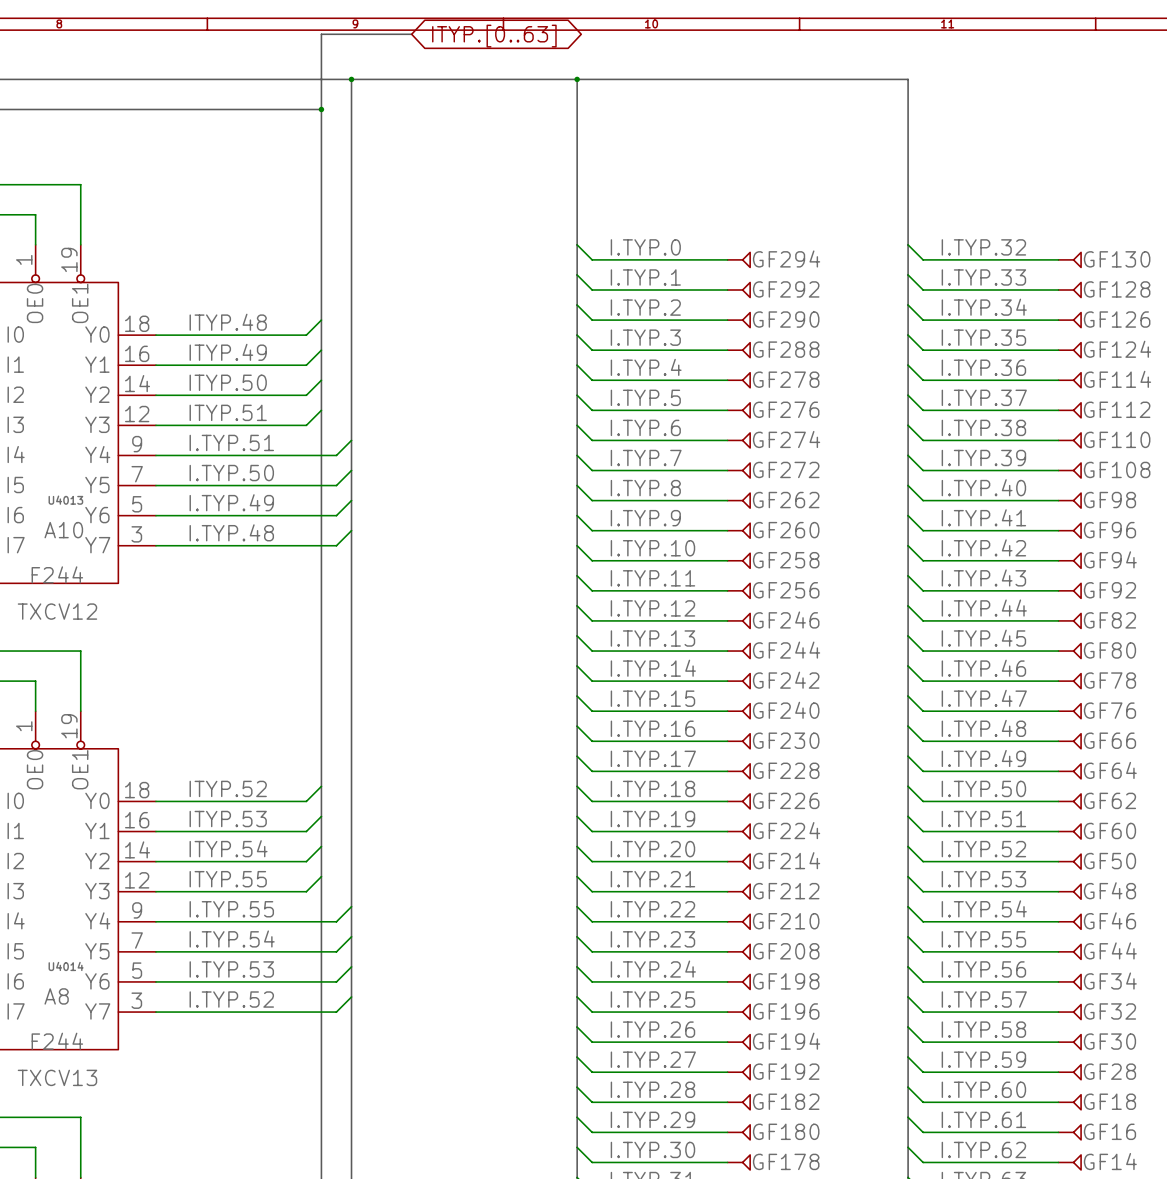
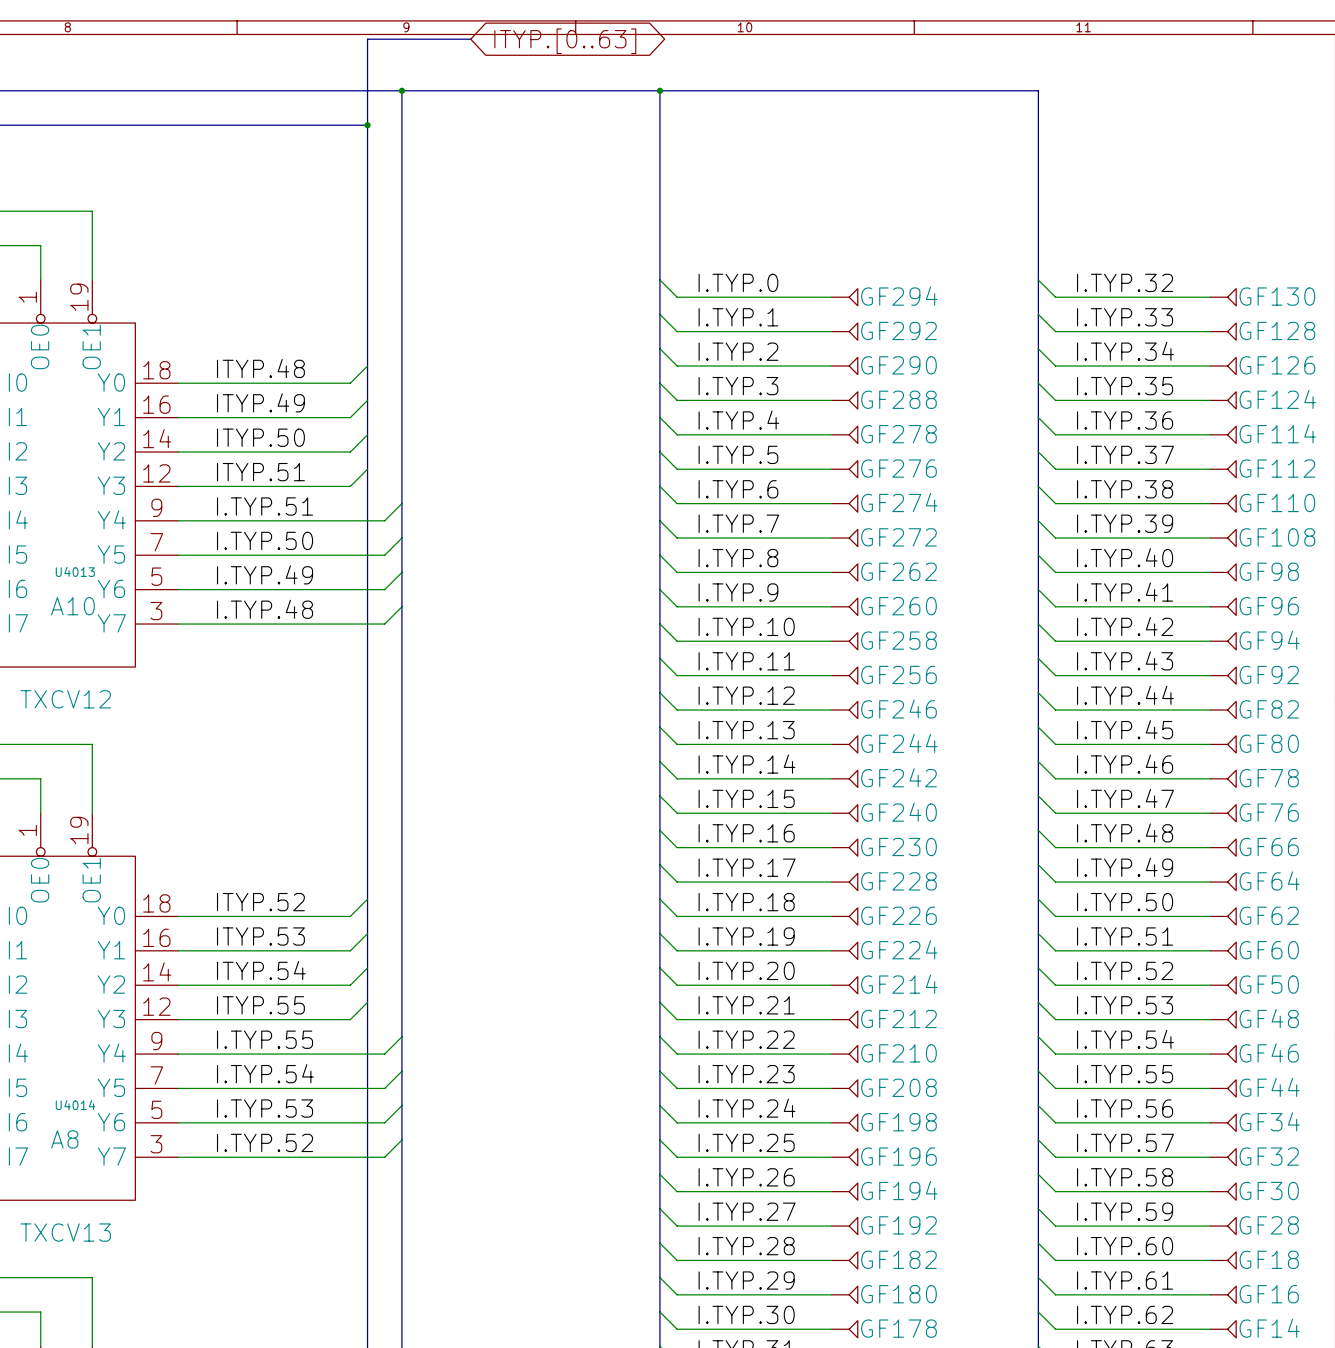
U4013 value: F244 (57, 574) -> none
U4014 value: F244 (57, 1041) -> none

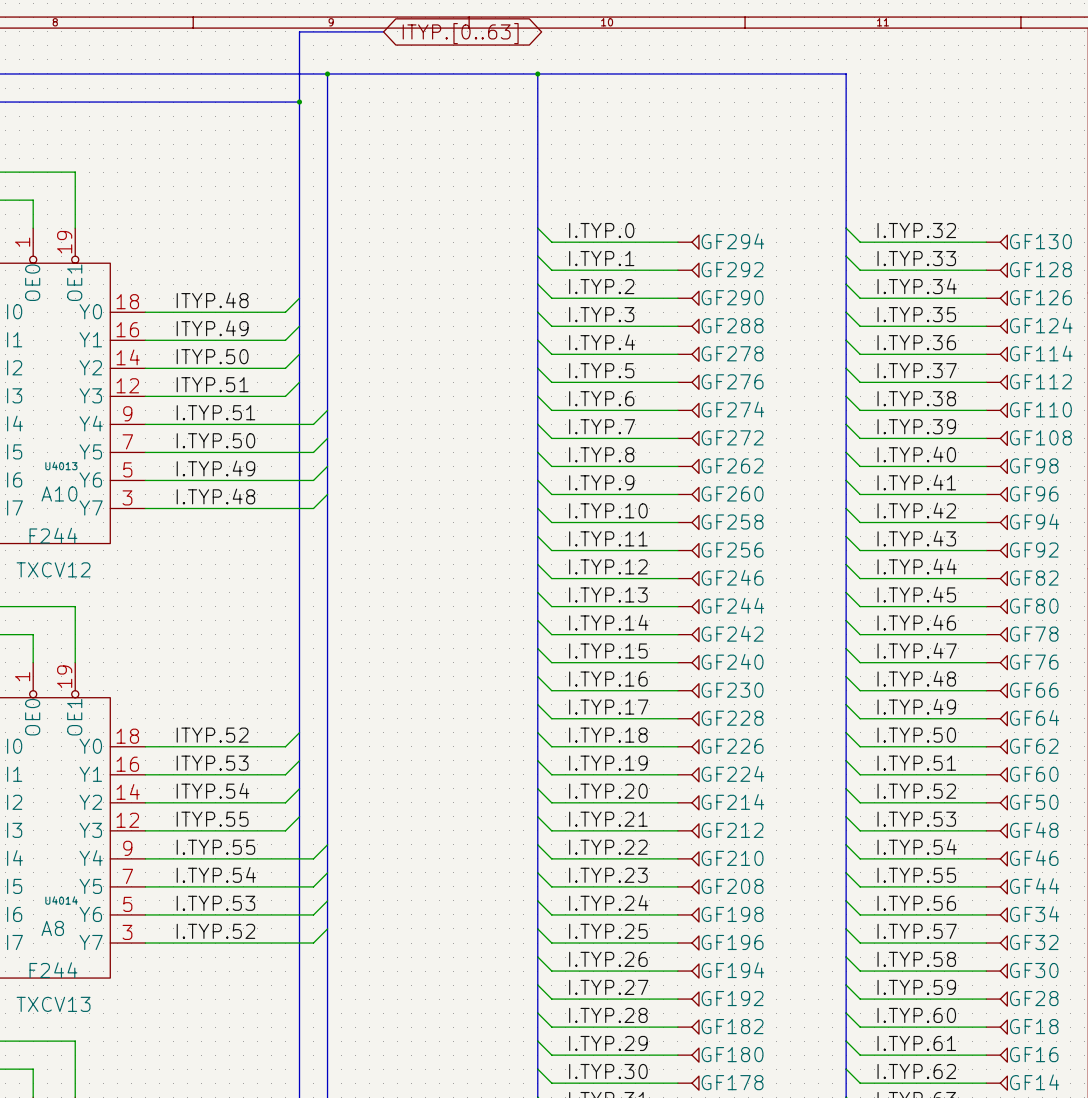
U4013 value: none -> F244 (53, 535)
U4014 value: none -> F244 (53, 970)

